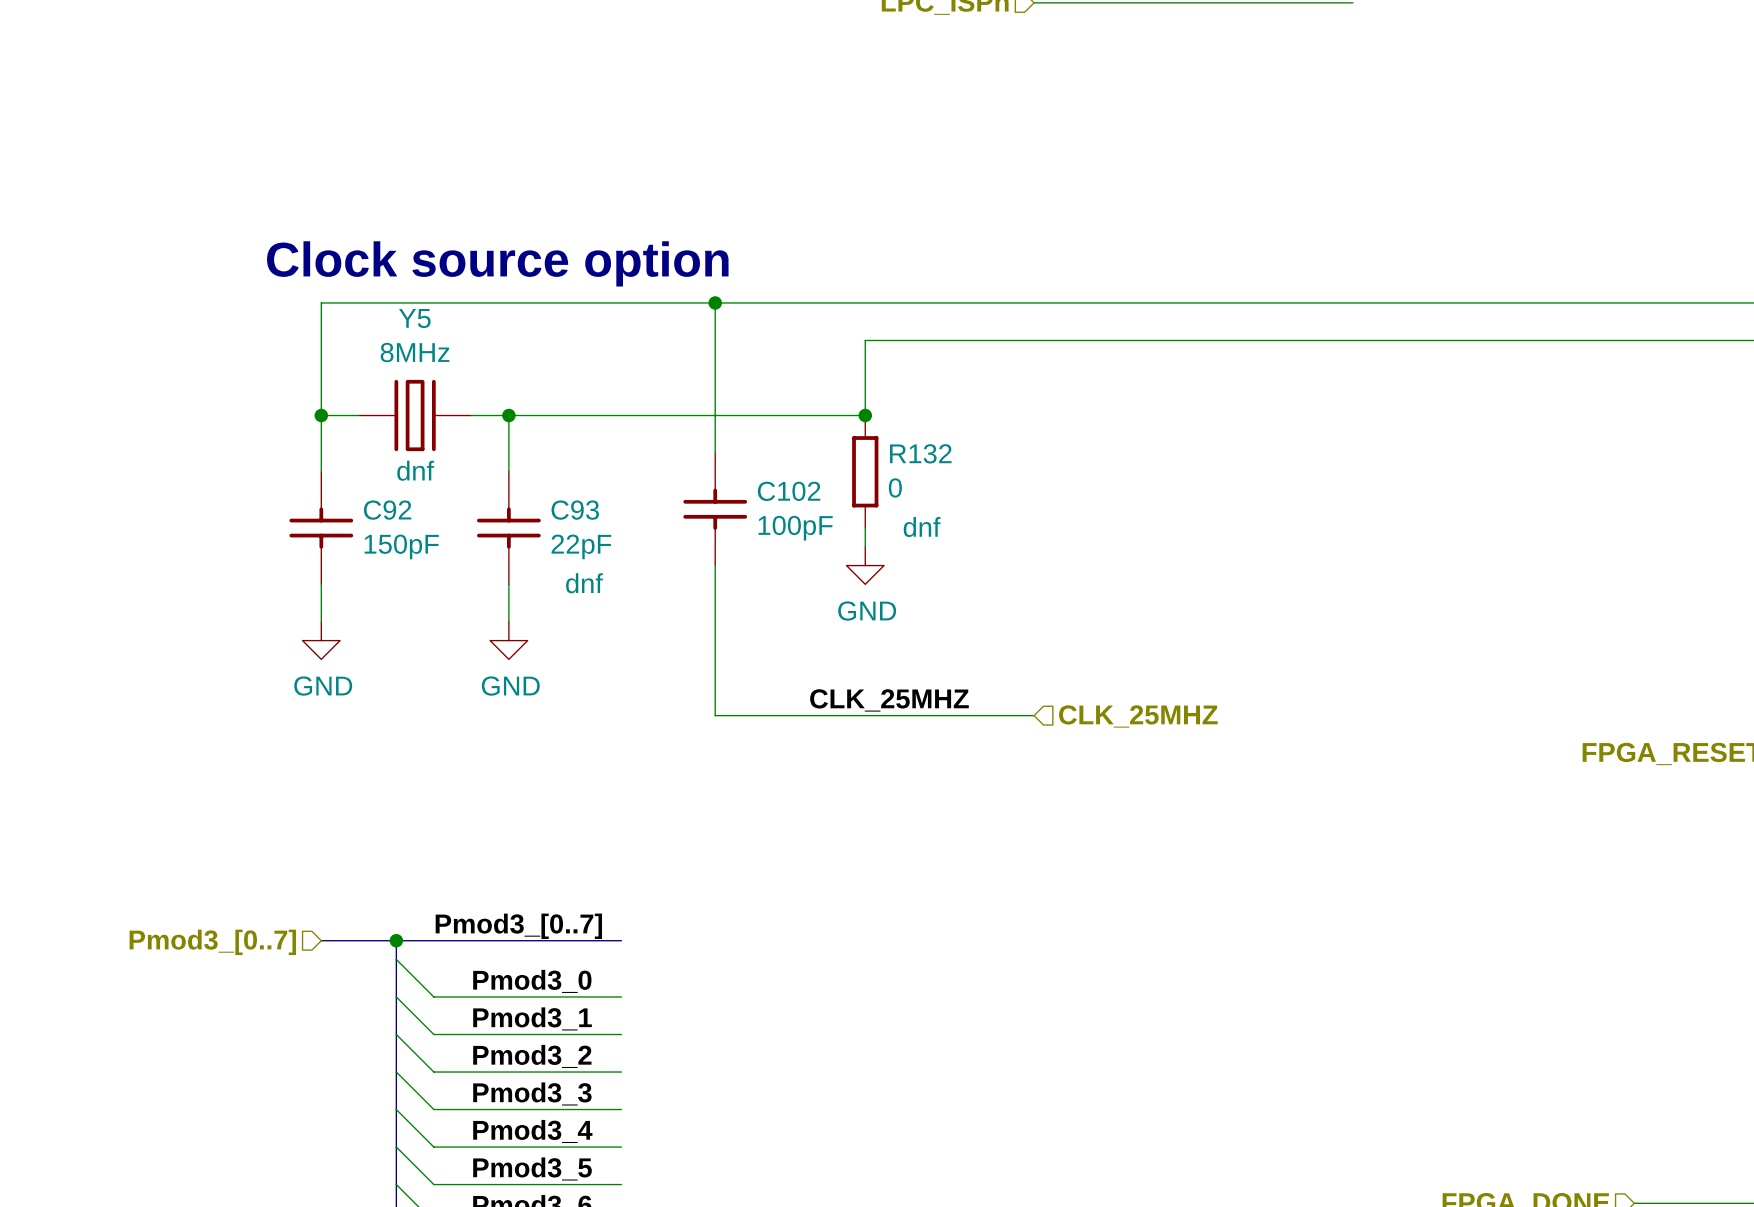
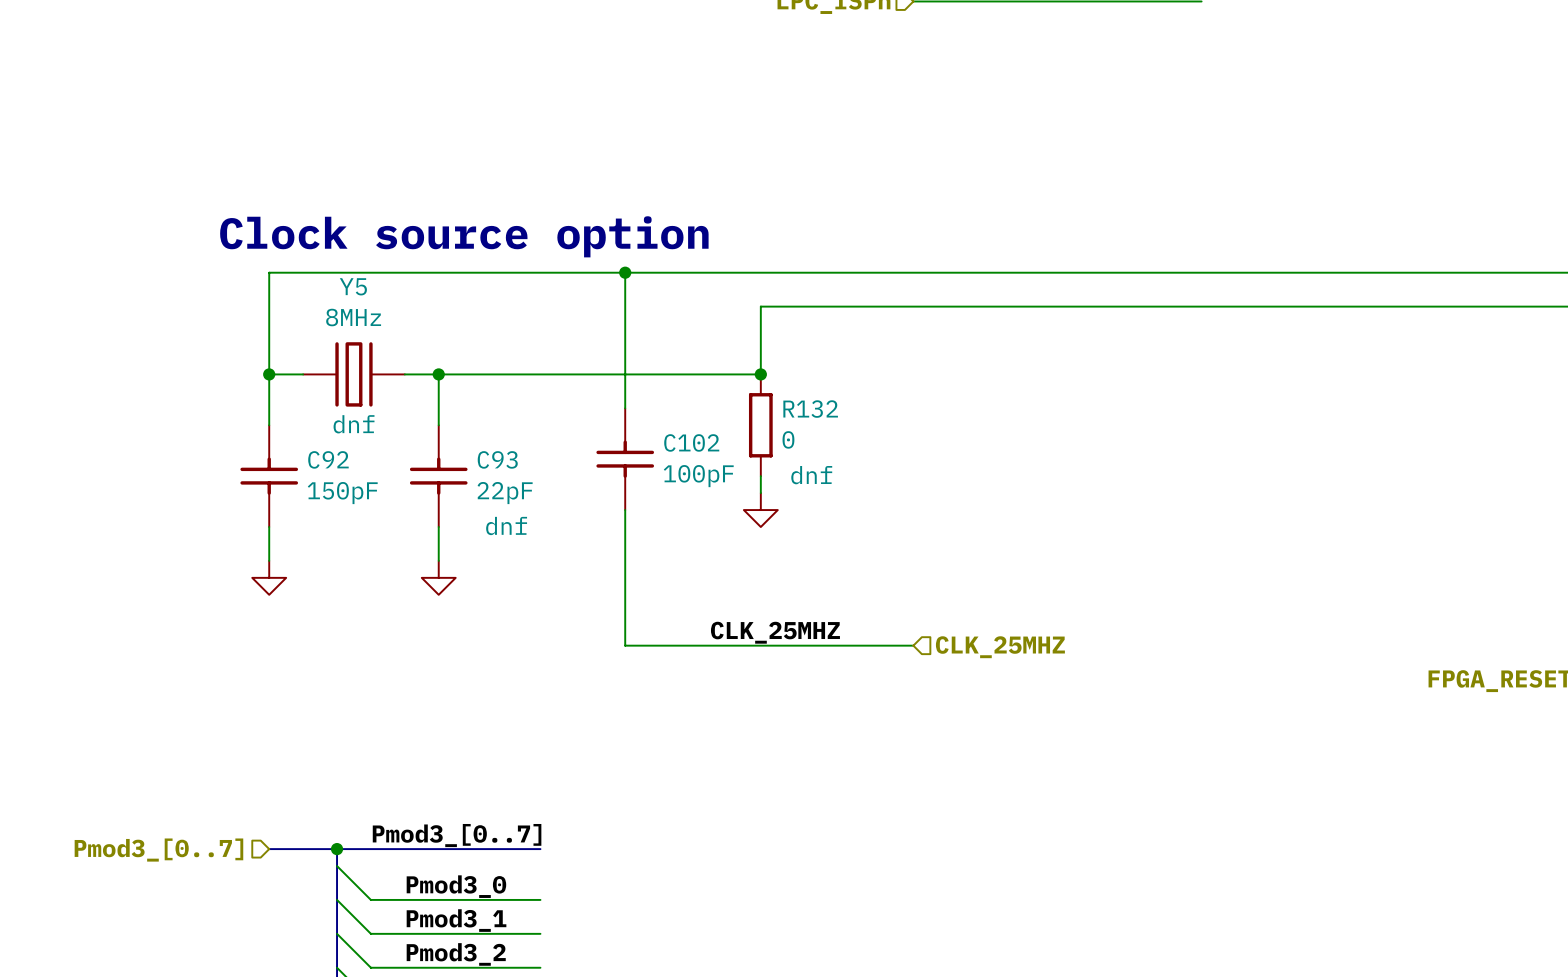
power symbol text: GND (867, 611) -> none
power symbol text: GND (323, 686) -> none
power symbol text: GND (510, 686) -> none

